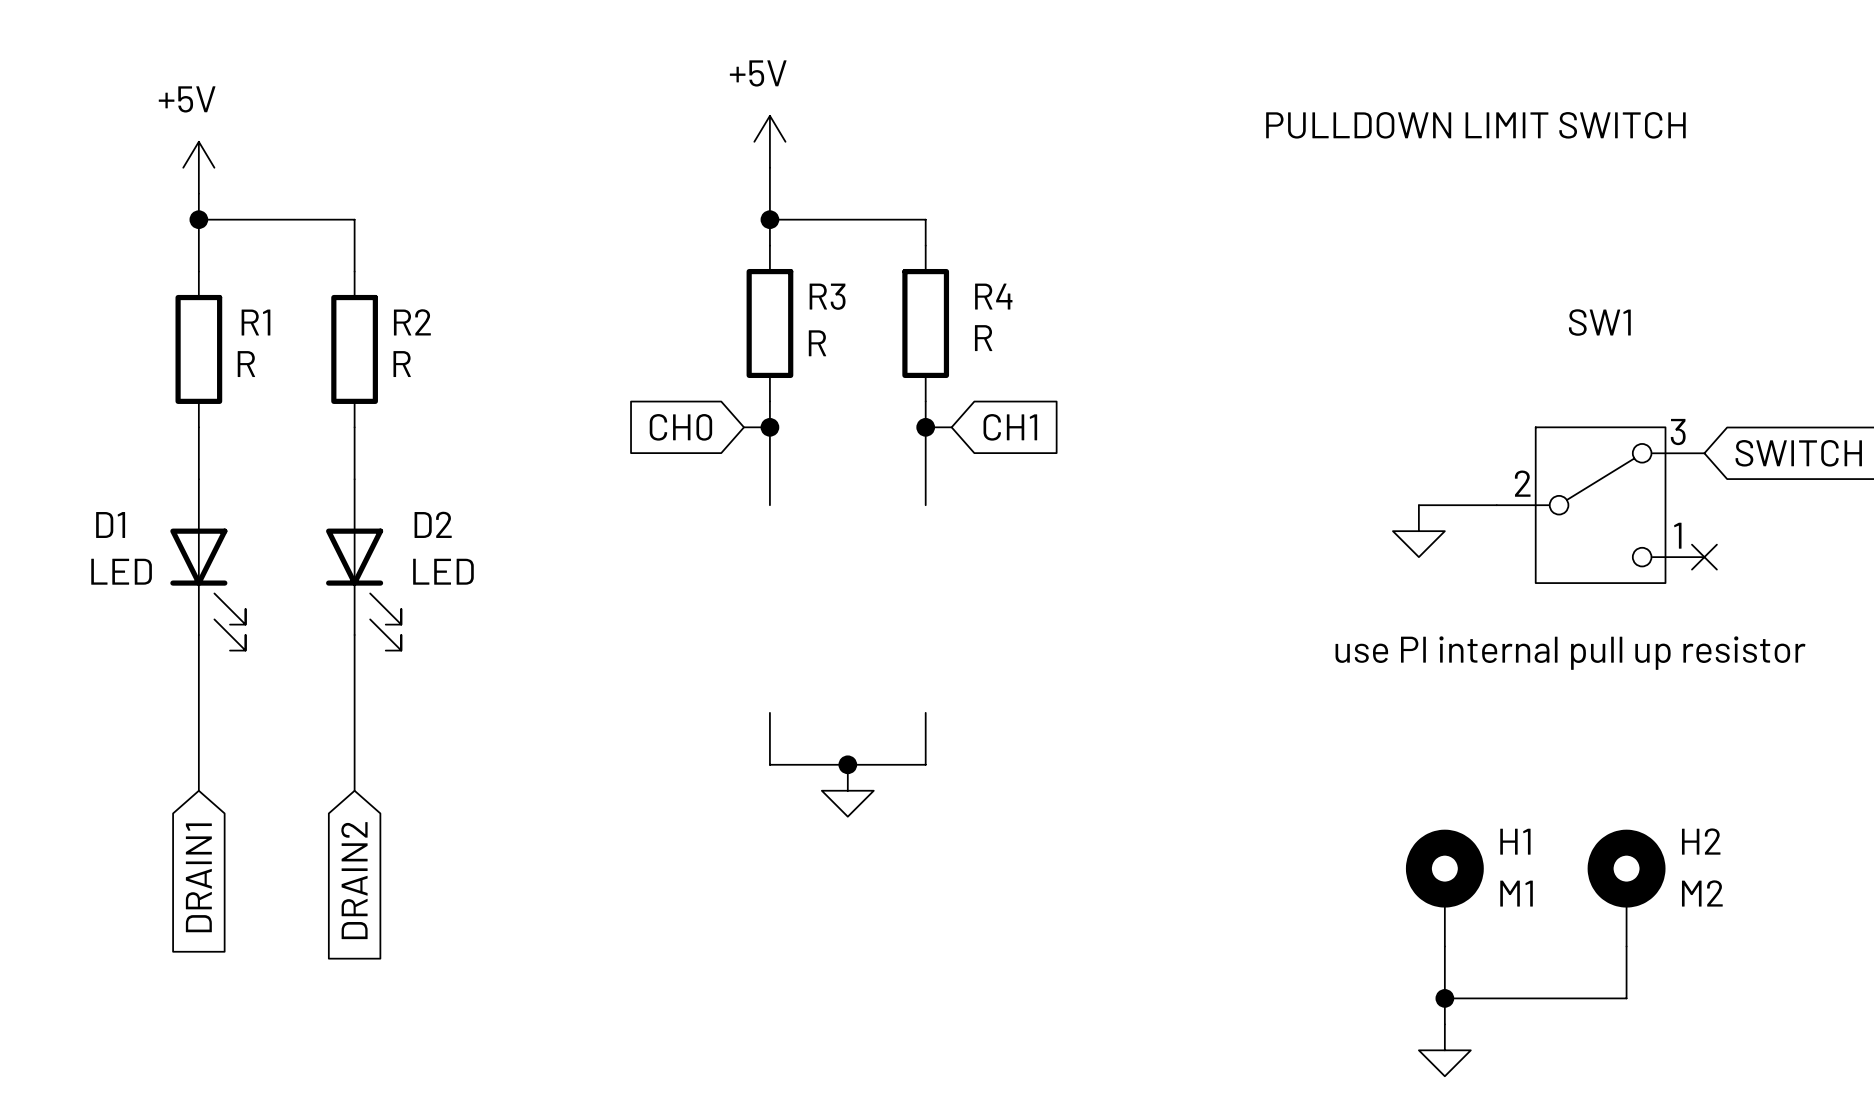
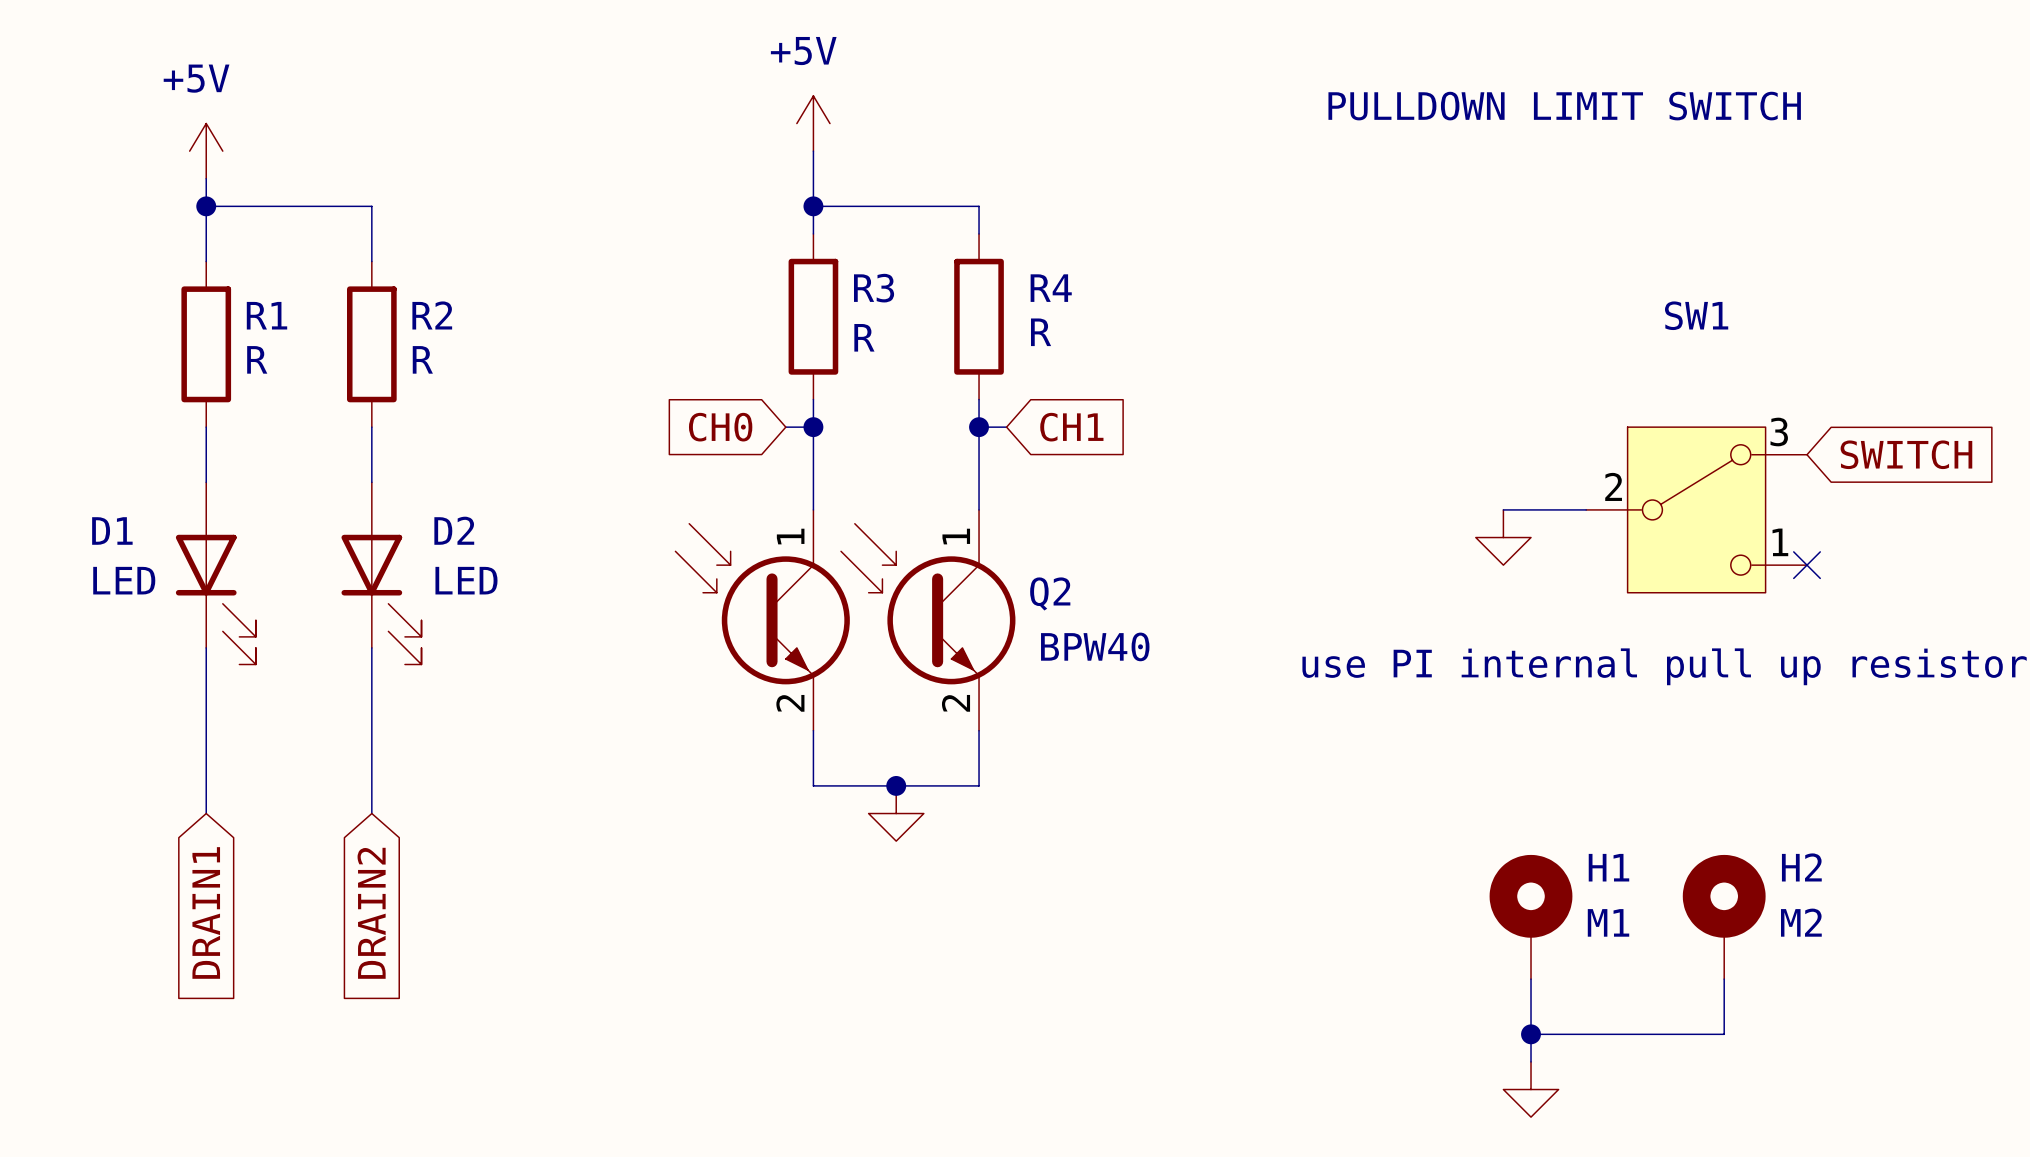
part: none -> (762, 620)
Q2: none -> BPW40 (928, 620)

